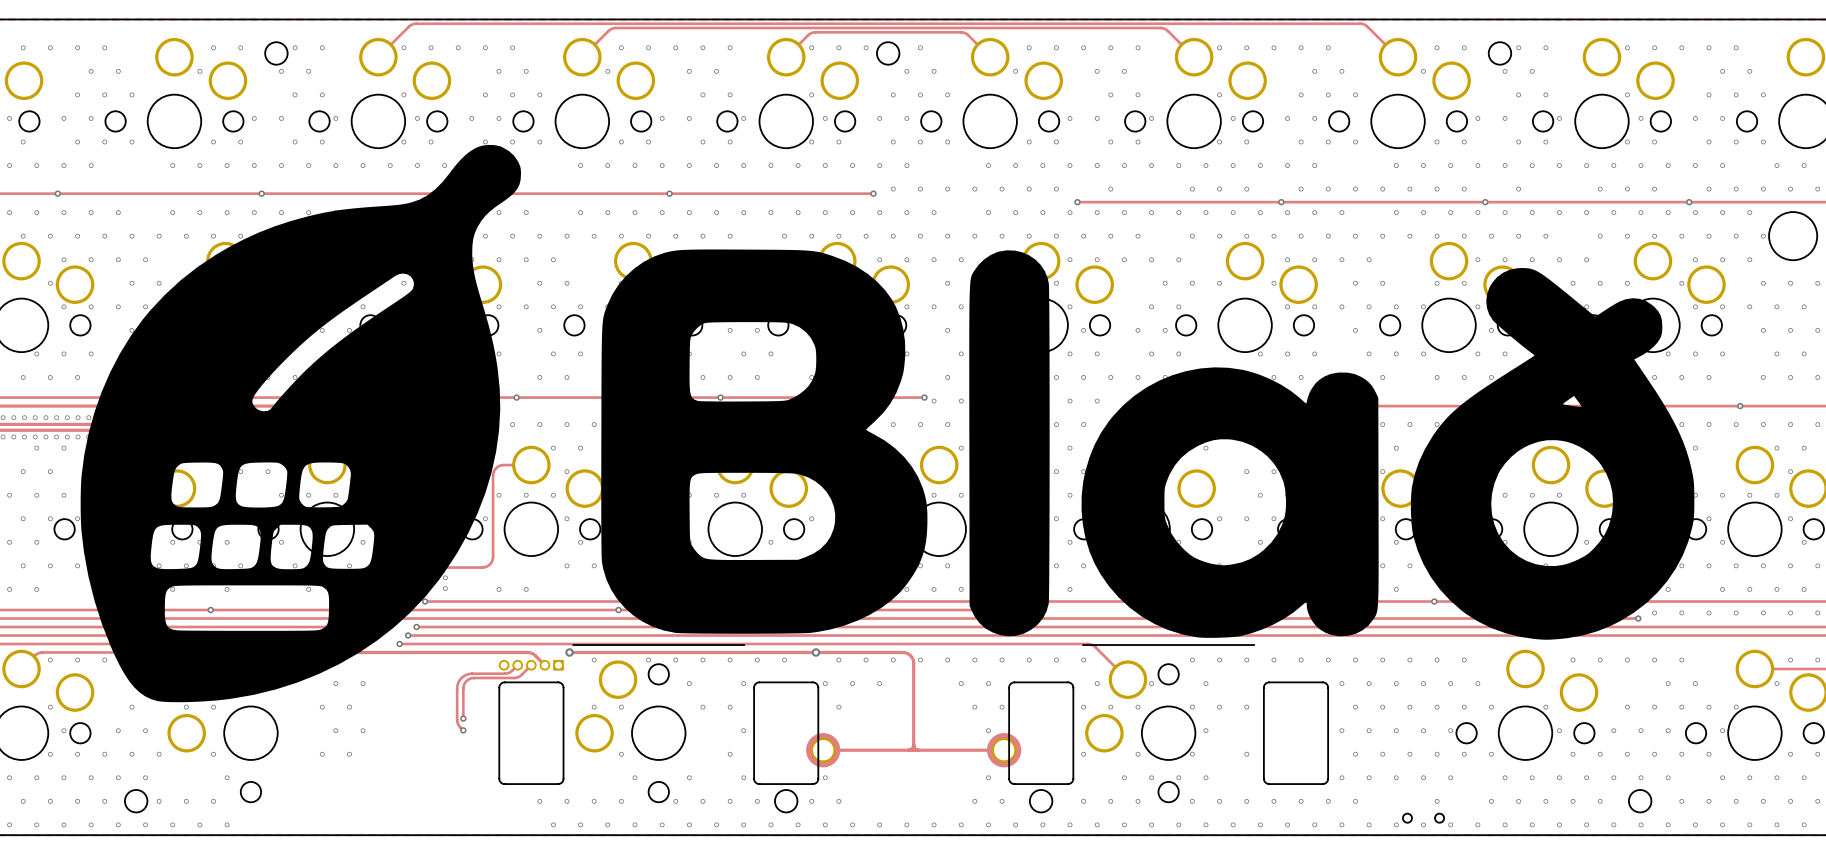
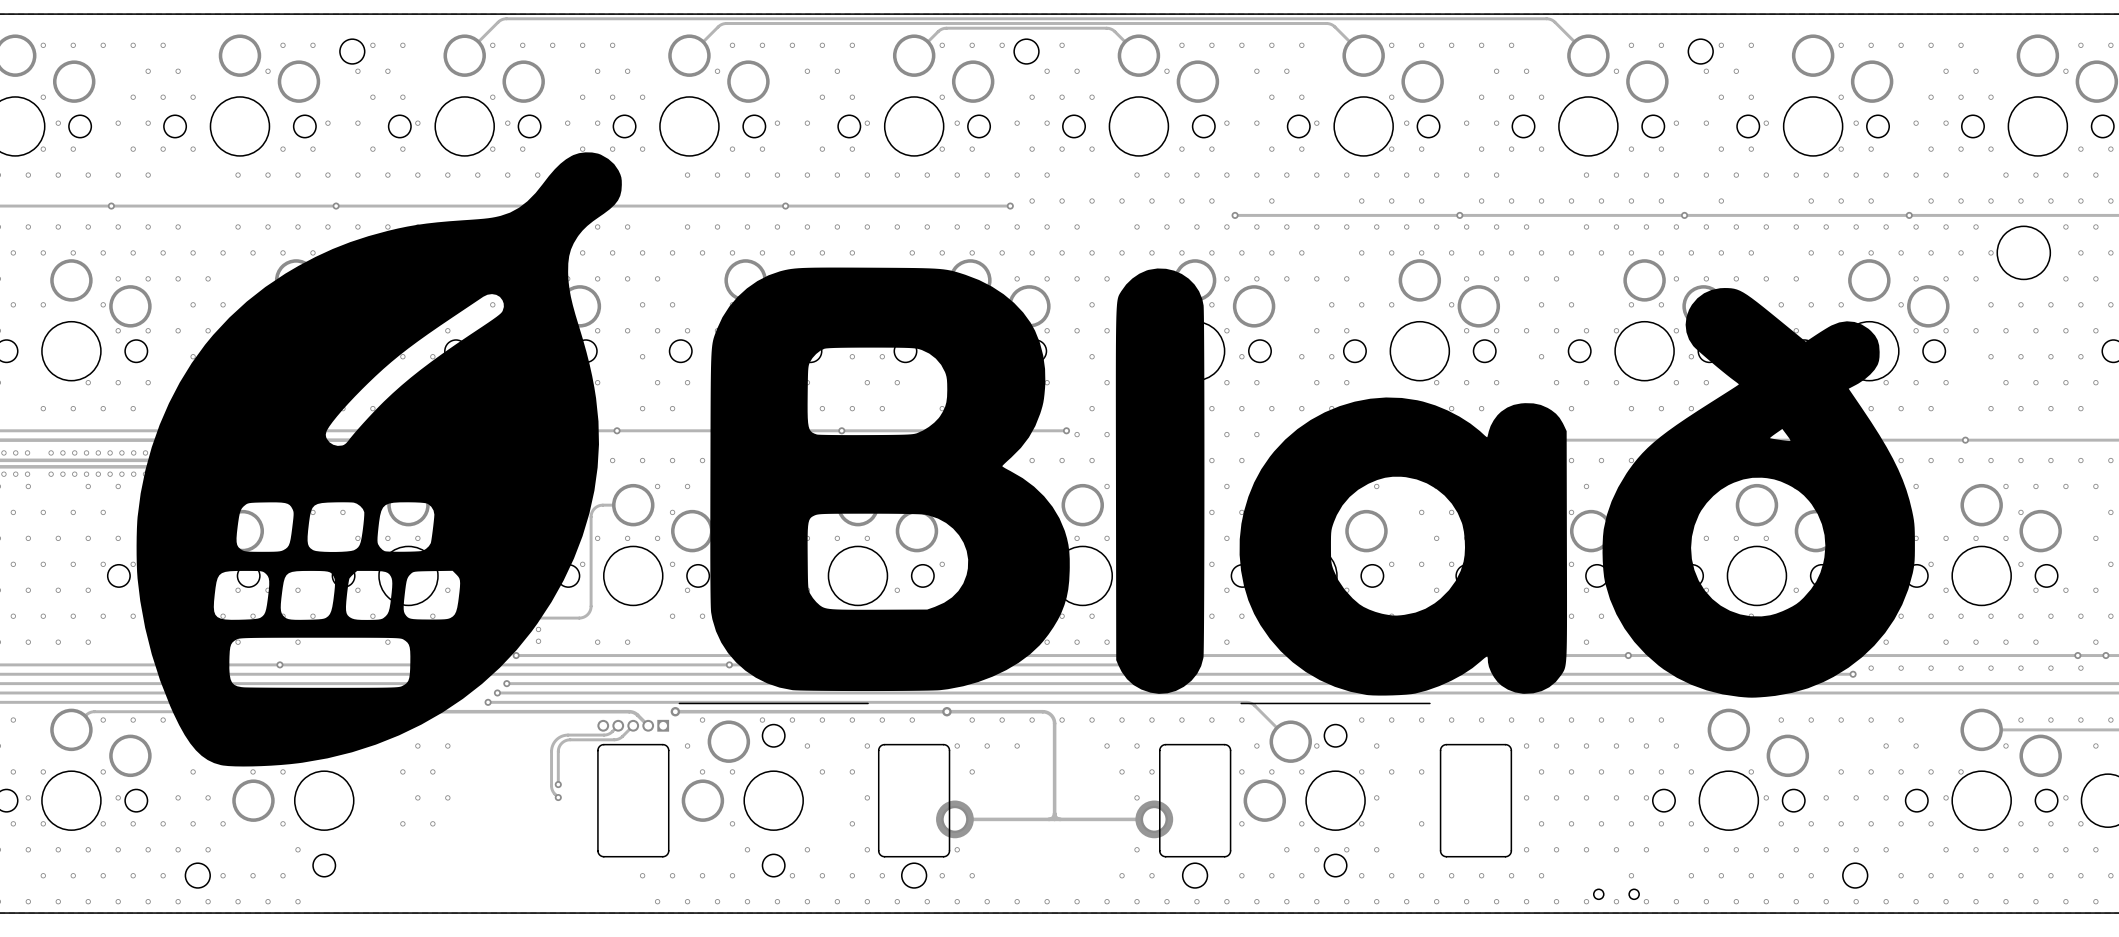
via: none -> (687, 745)

